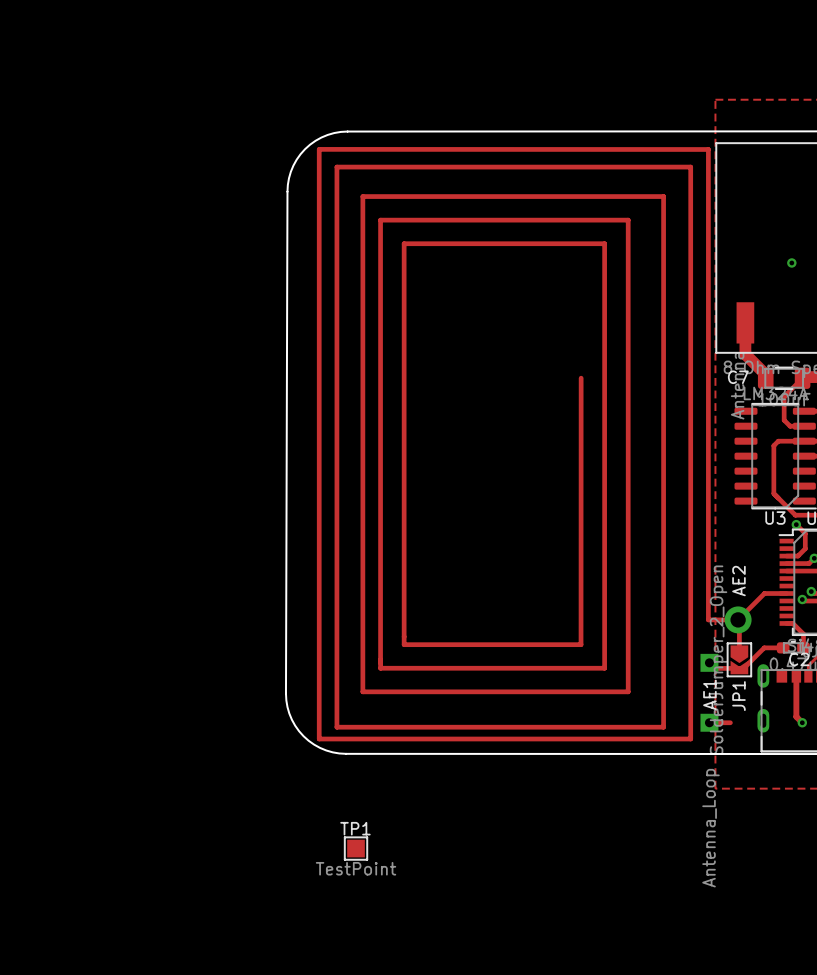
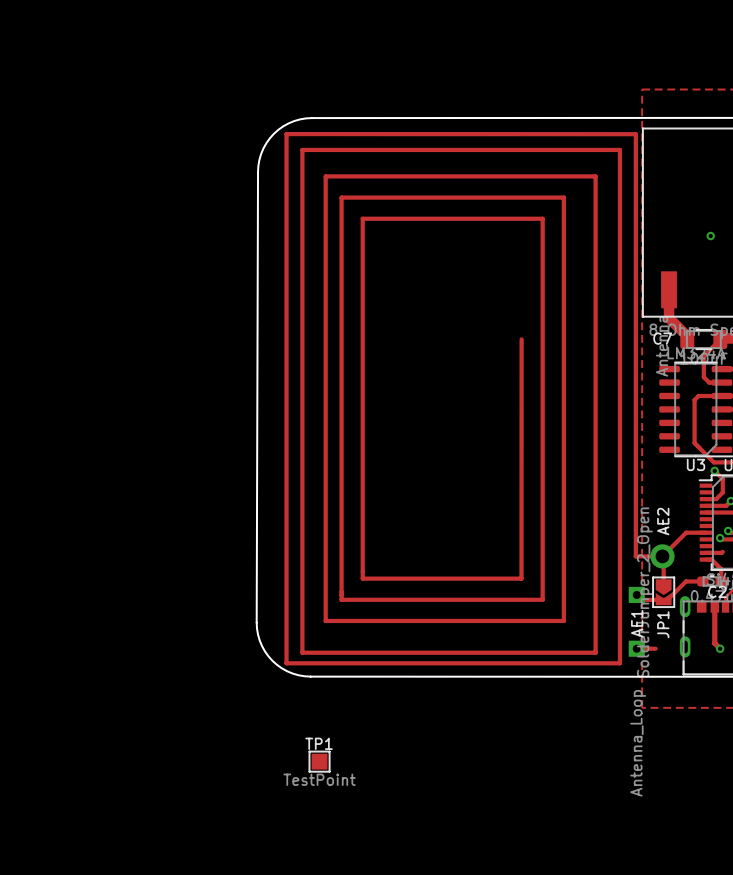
track: none -> (722, 551) (706, 552)

